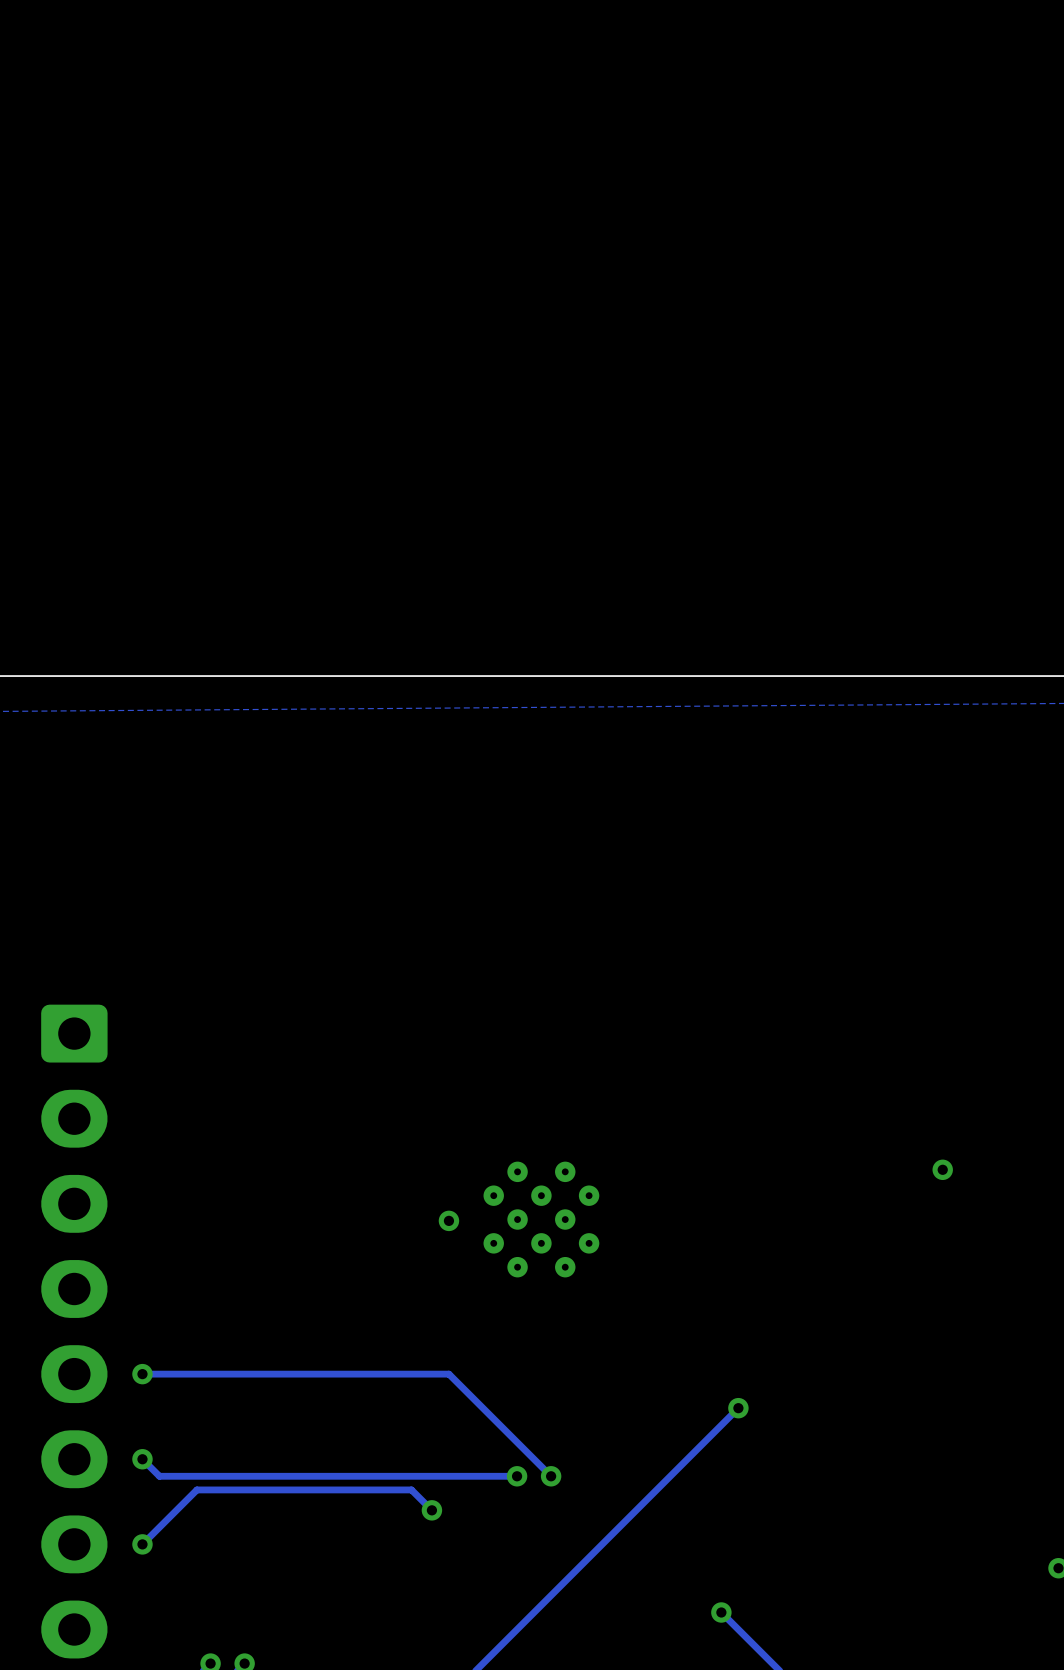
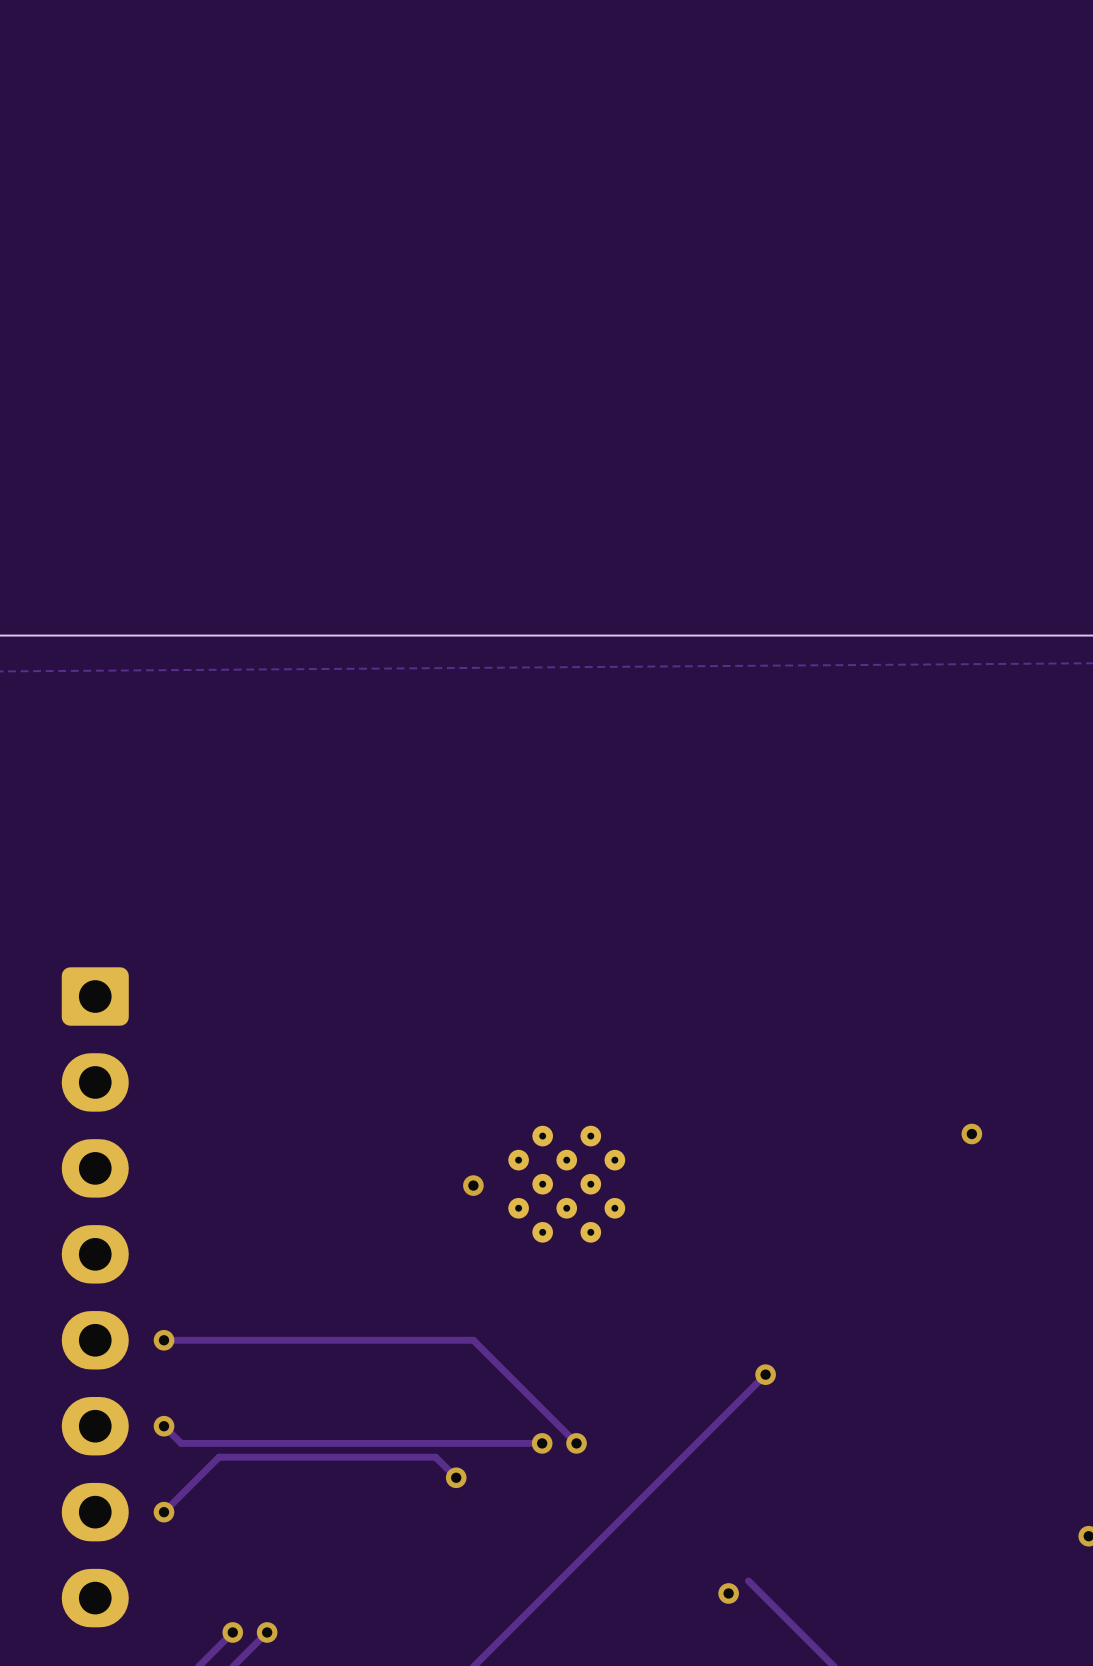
via position: (721, 1612) -> (728, 1593)

